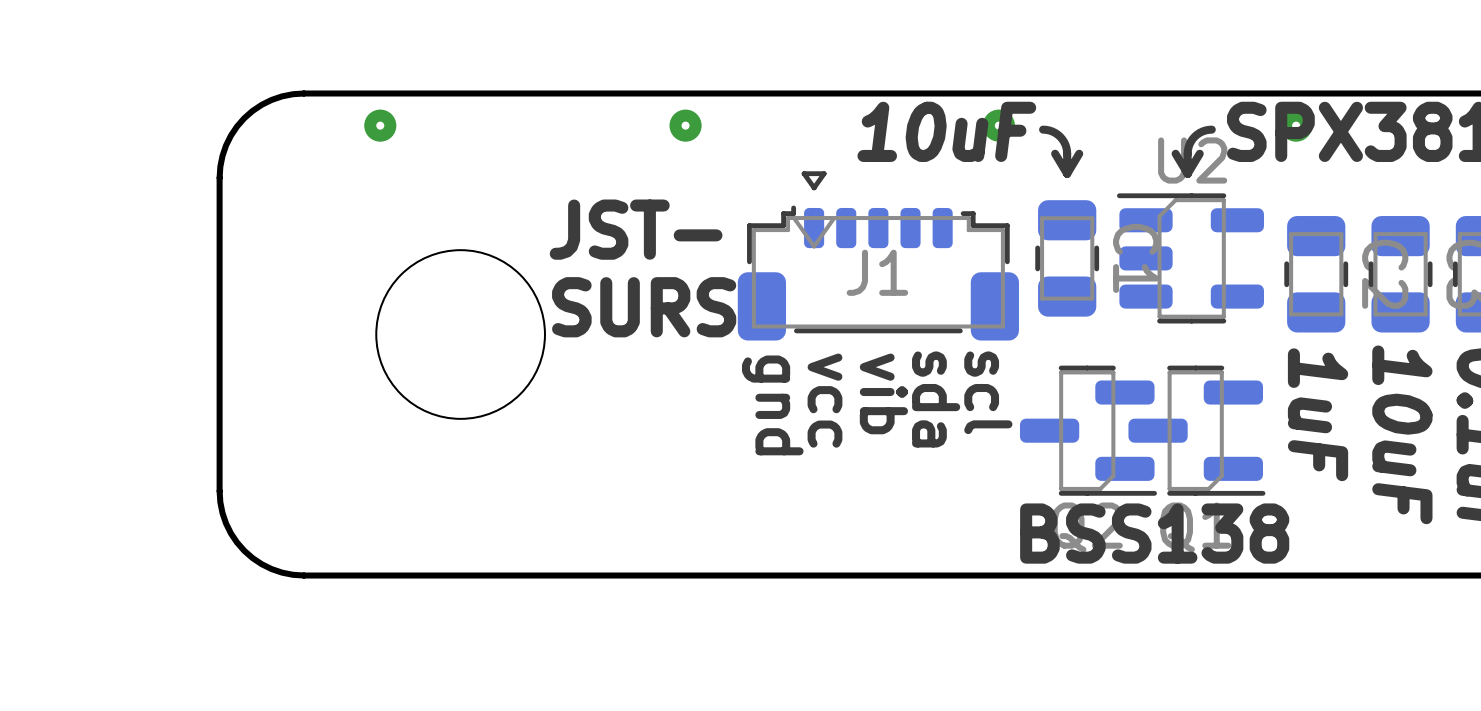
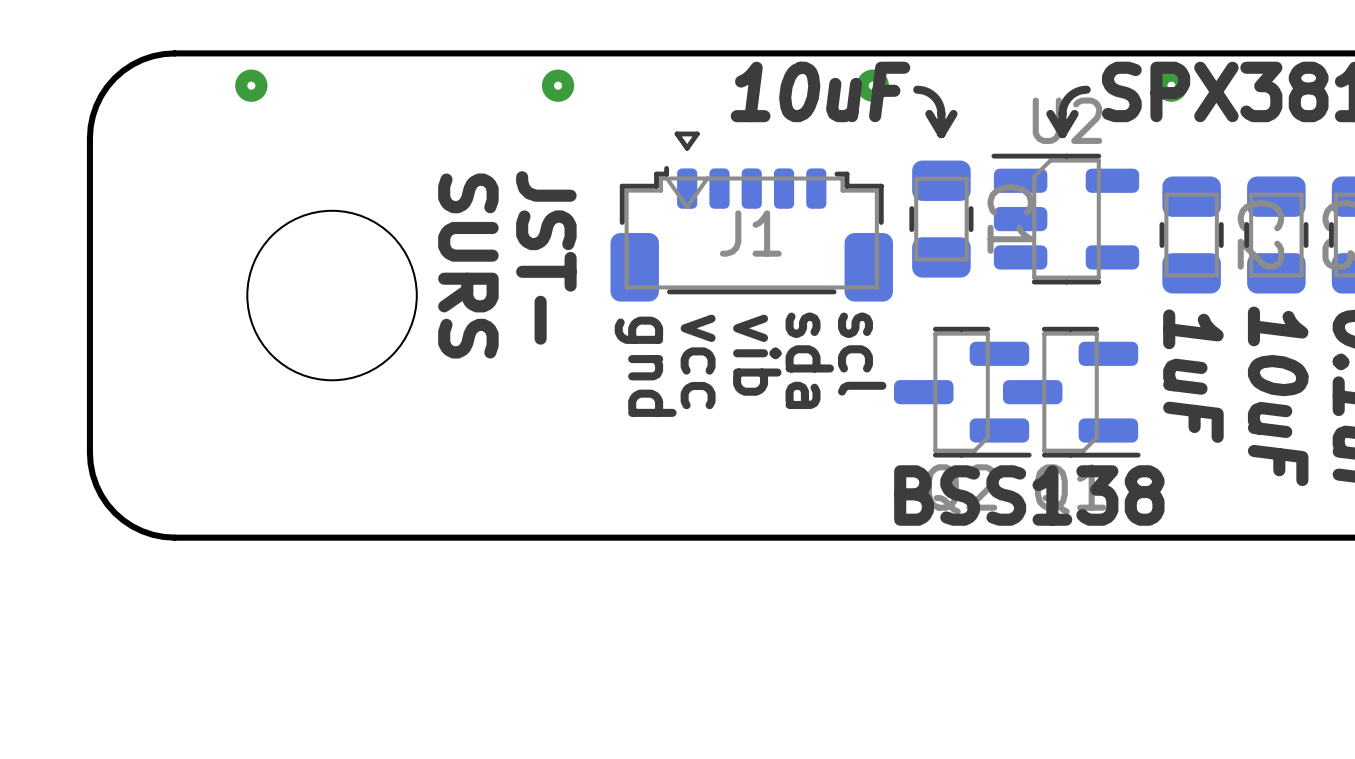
text rotation: 0° (636, 229) -> 90° clockwise (546, 257)
text rotation: 0° (644, 307) -> 90° clockwise (468, 266)

